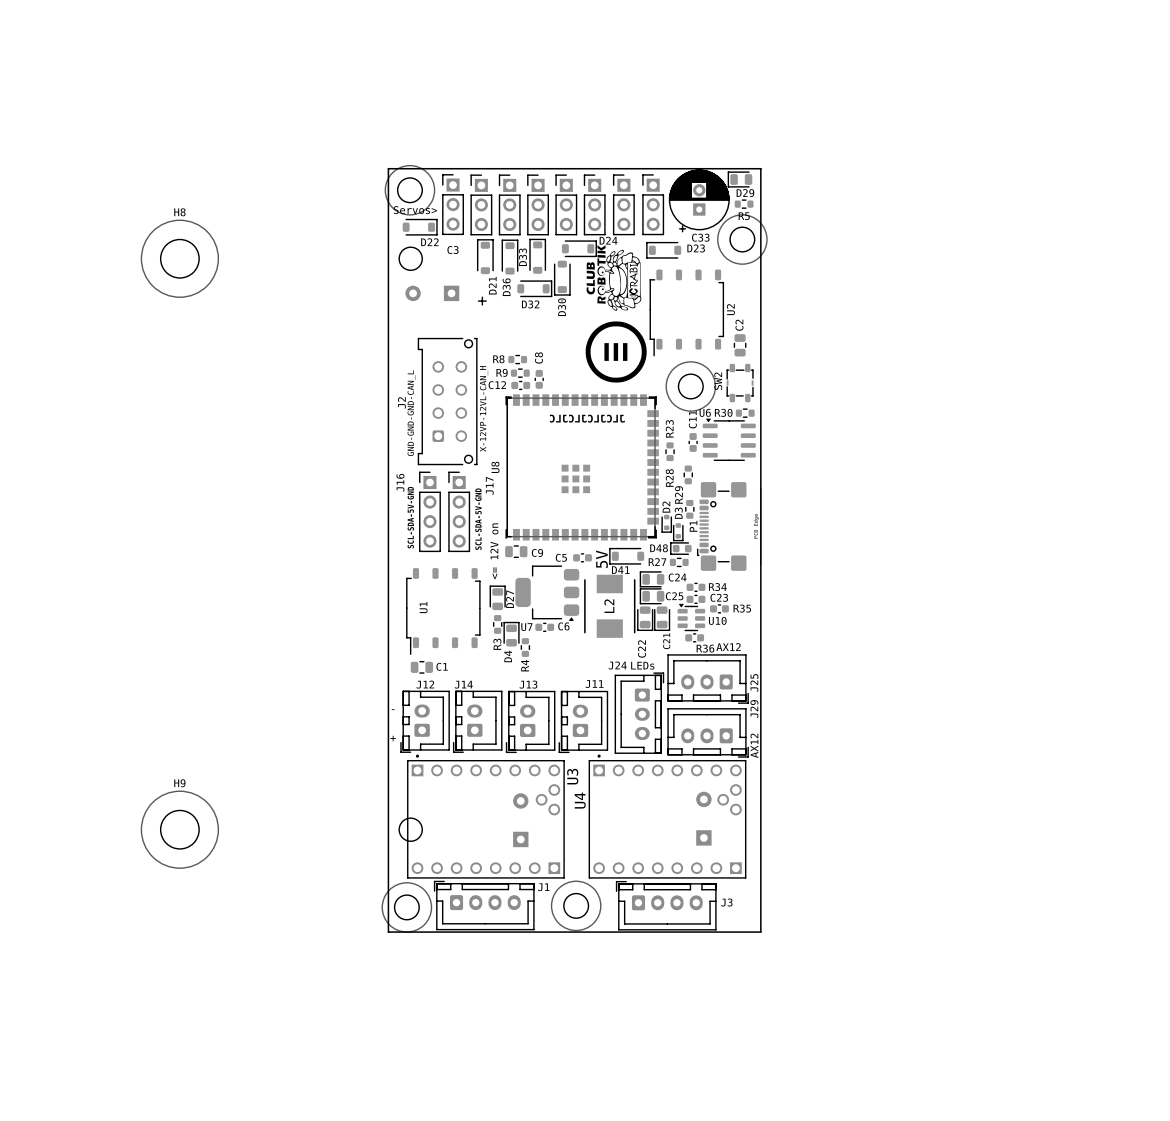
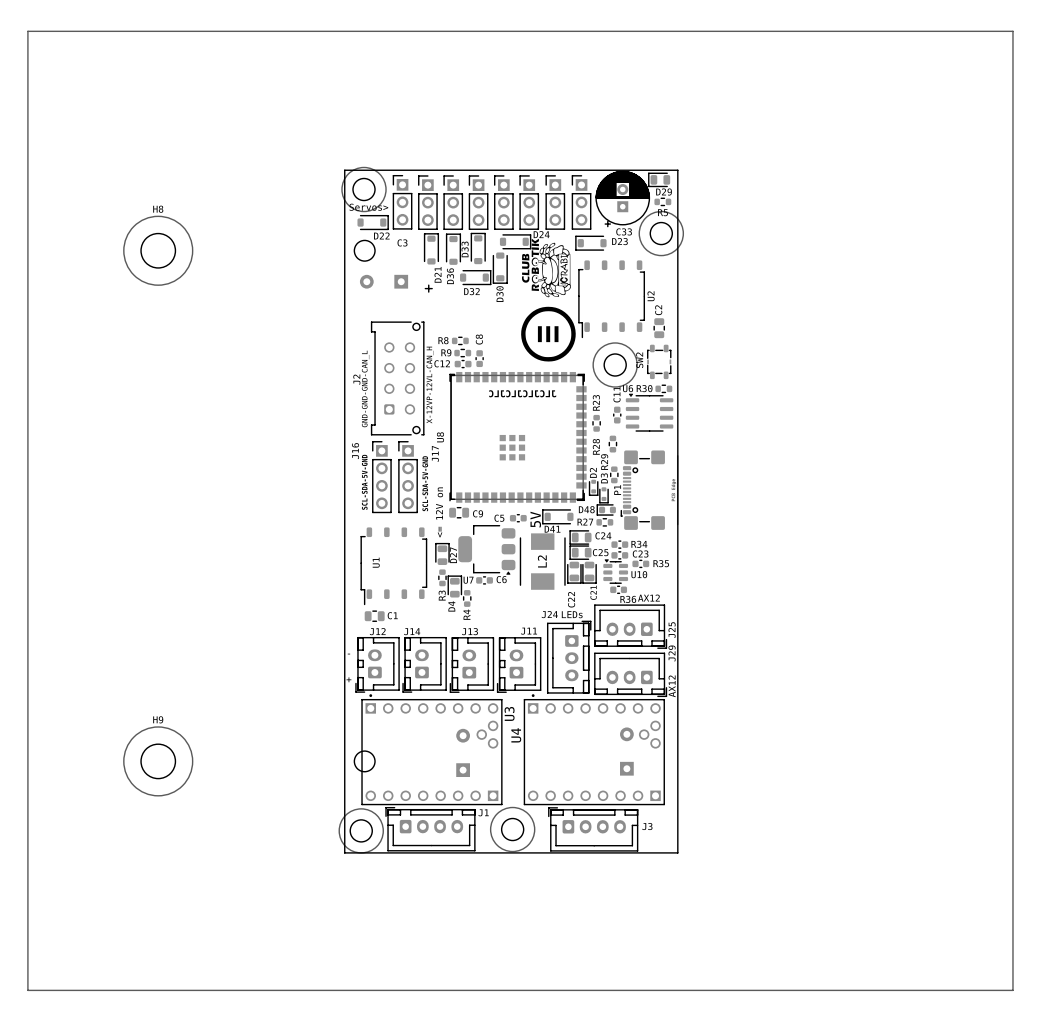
line: none -> (27, 31) (1012, 31) (1012, 990) (27, 990) (27, 31)

